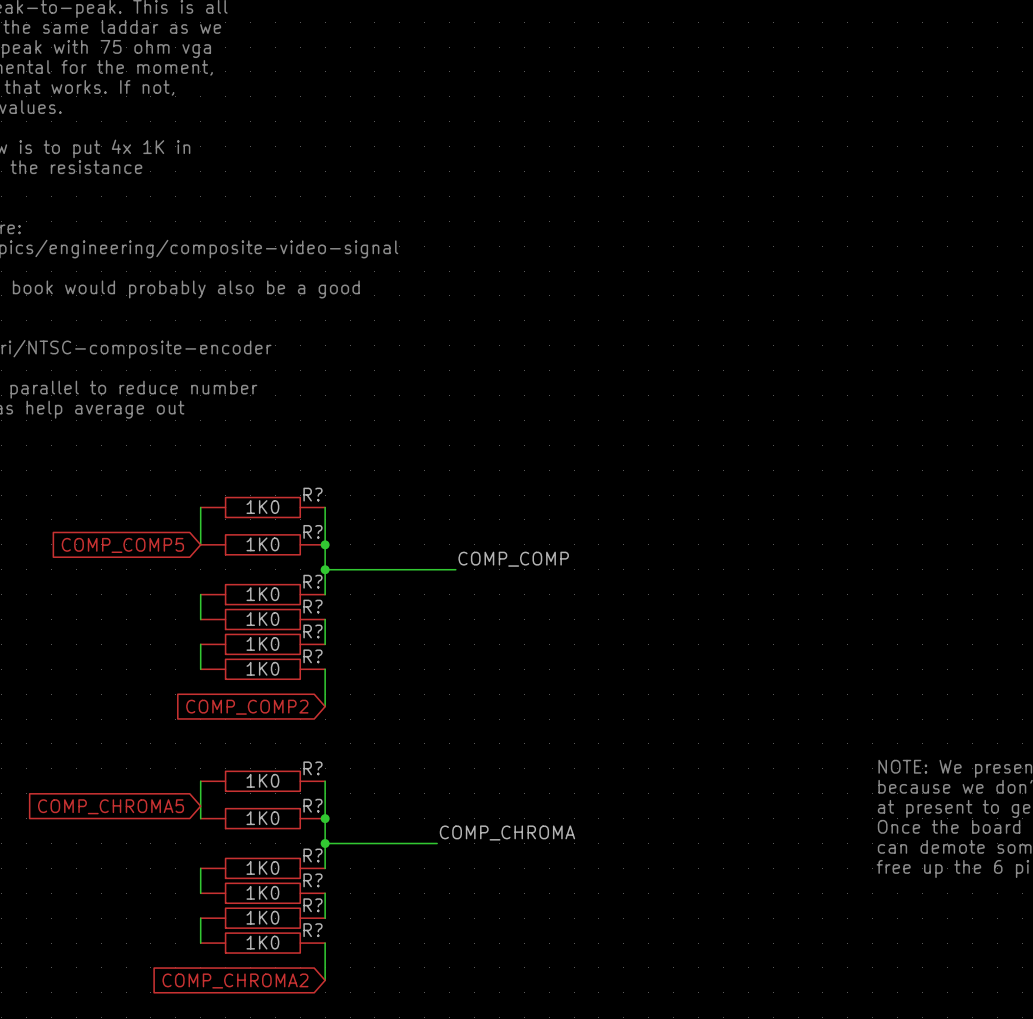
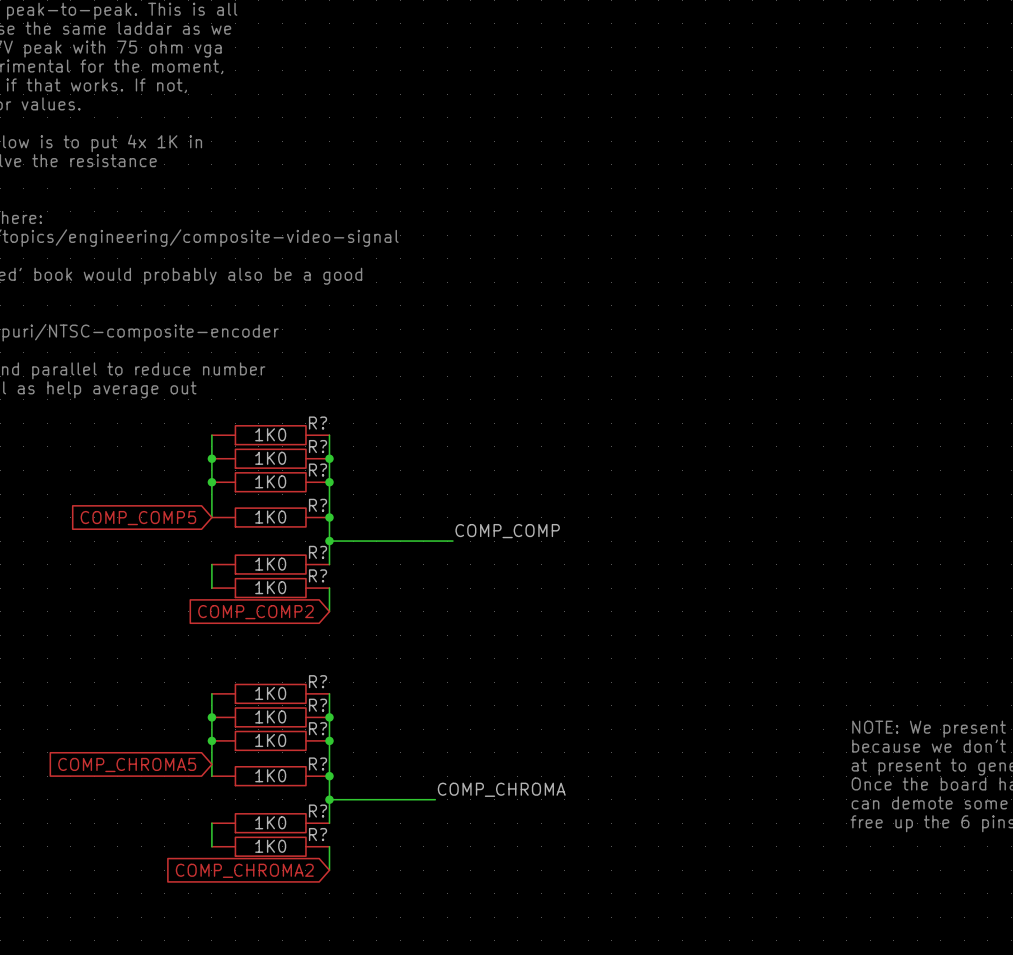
wire: none -> (211, 435) (211, 482)
R?: none -> 1K0 (270, 435)
wire: none -> (329, 435) (329, 482)
junction: none -> (211, 458)
R?: none -> 1K0 (270, 458)
junction: none -> (329, 458)
junction: none -> (211, 482)
junction: none -> (329, 482)
wire: (200, 644) (200, 669) -> none
R?: 1K0 (262, 644) -> none
R?: 1K0 (262, 669) -> none
wire: (325, 669) (325, 706) -> none
global label position: COMP_COMP2 (247, 707) -> COMP_COMP2 (255, 612)
wire: none -> (211, 693) (211, 740)
R?: none -> 1K0 (270, 693)
wire: none -> (329, 693) (329, 740)
junction: none -> (211, 717)
R?: none -> 1K0 (270, 717)
junction: none -> (329, 717)
junction: none -> (211, 740)
junction: none -> (329, 740)
wire: (200, 918) (200, 943) -> none
R?: 1K0 (262, 918) -> none
R?: 1K0 (262, 943) -> none
wire: (325, 943) (325, 980) -> none
global label position: COMP_CHROMA2 (235, 980) -> COMP_CHROMA2 (244, 870)

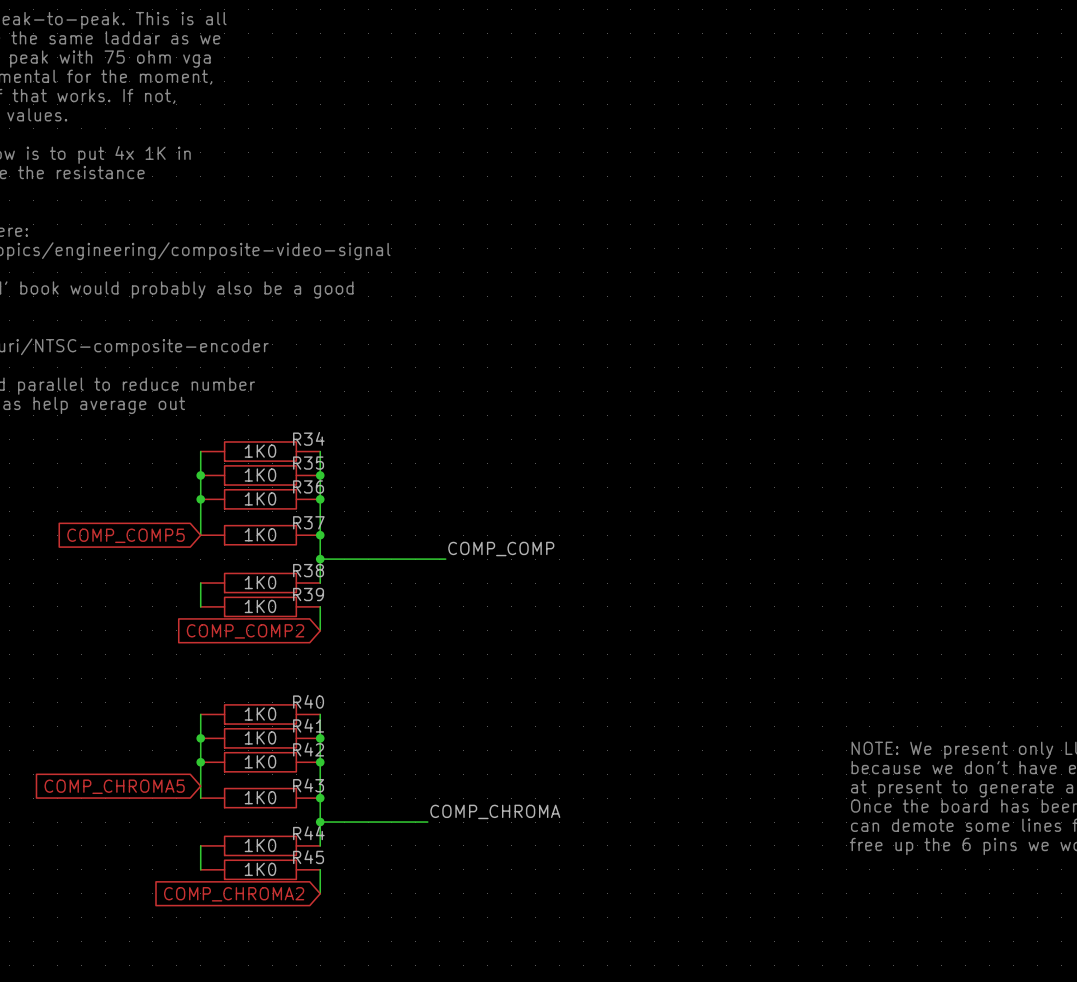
R? name: R? (318, 423) -> R34 (308, 438)
R? name: R? (318, 446) -> R35 (308, 463)
R? name: R? (318, 470) -> R36 (308, 486)
R? name: R? (318, 505) -> R37 (308, 522)
R? name: R? (318, 552) -> R38 (308, 570)
R? name: R? (318, 575) -> R39 (308, 594)
R? name: R? (318, 681) -> R40 (308, 701)
R? name: R? (318, 705) -> R41 (308, 725)
R? name: R? (318, 728) -> R42 (308, 749)
R? name: R? (318, 763) -> R43 (308, 785)
R? name: R? (318, 811) -> R44 (308, 833)
R? name: R? (318, 834) -> R45 (308, 857)

